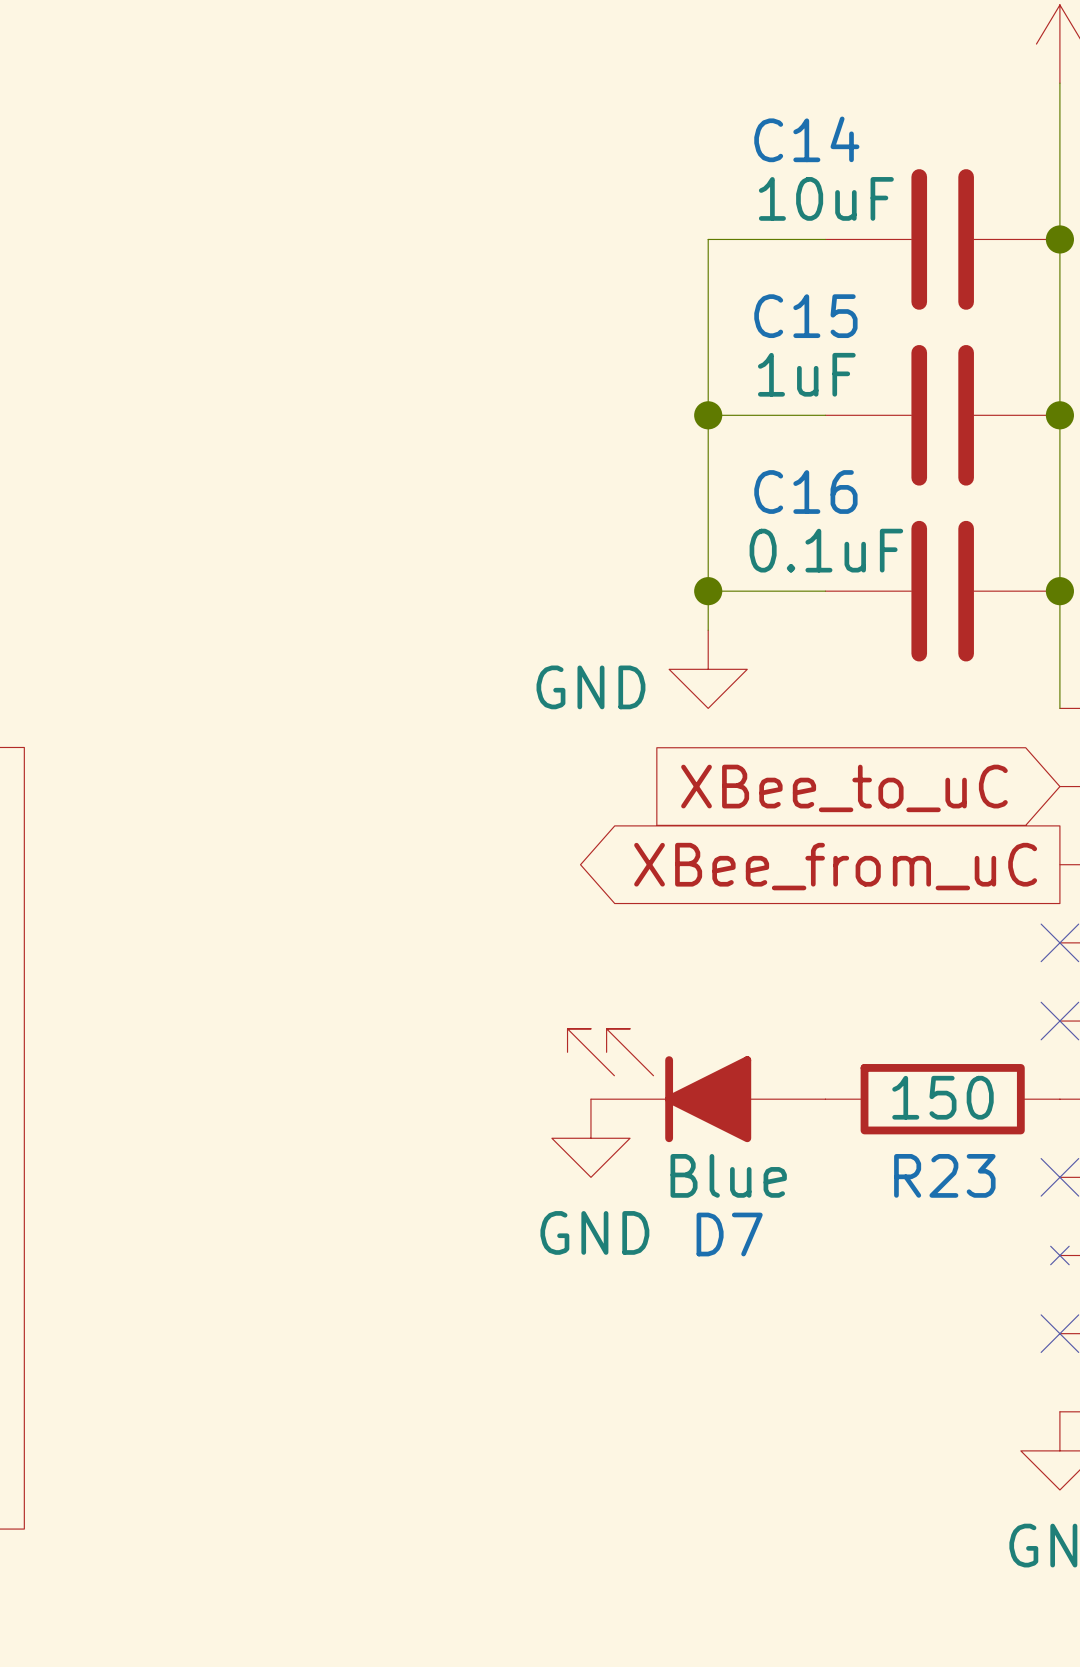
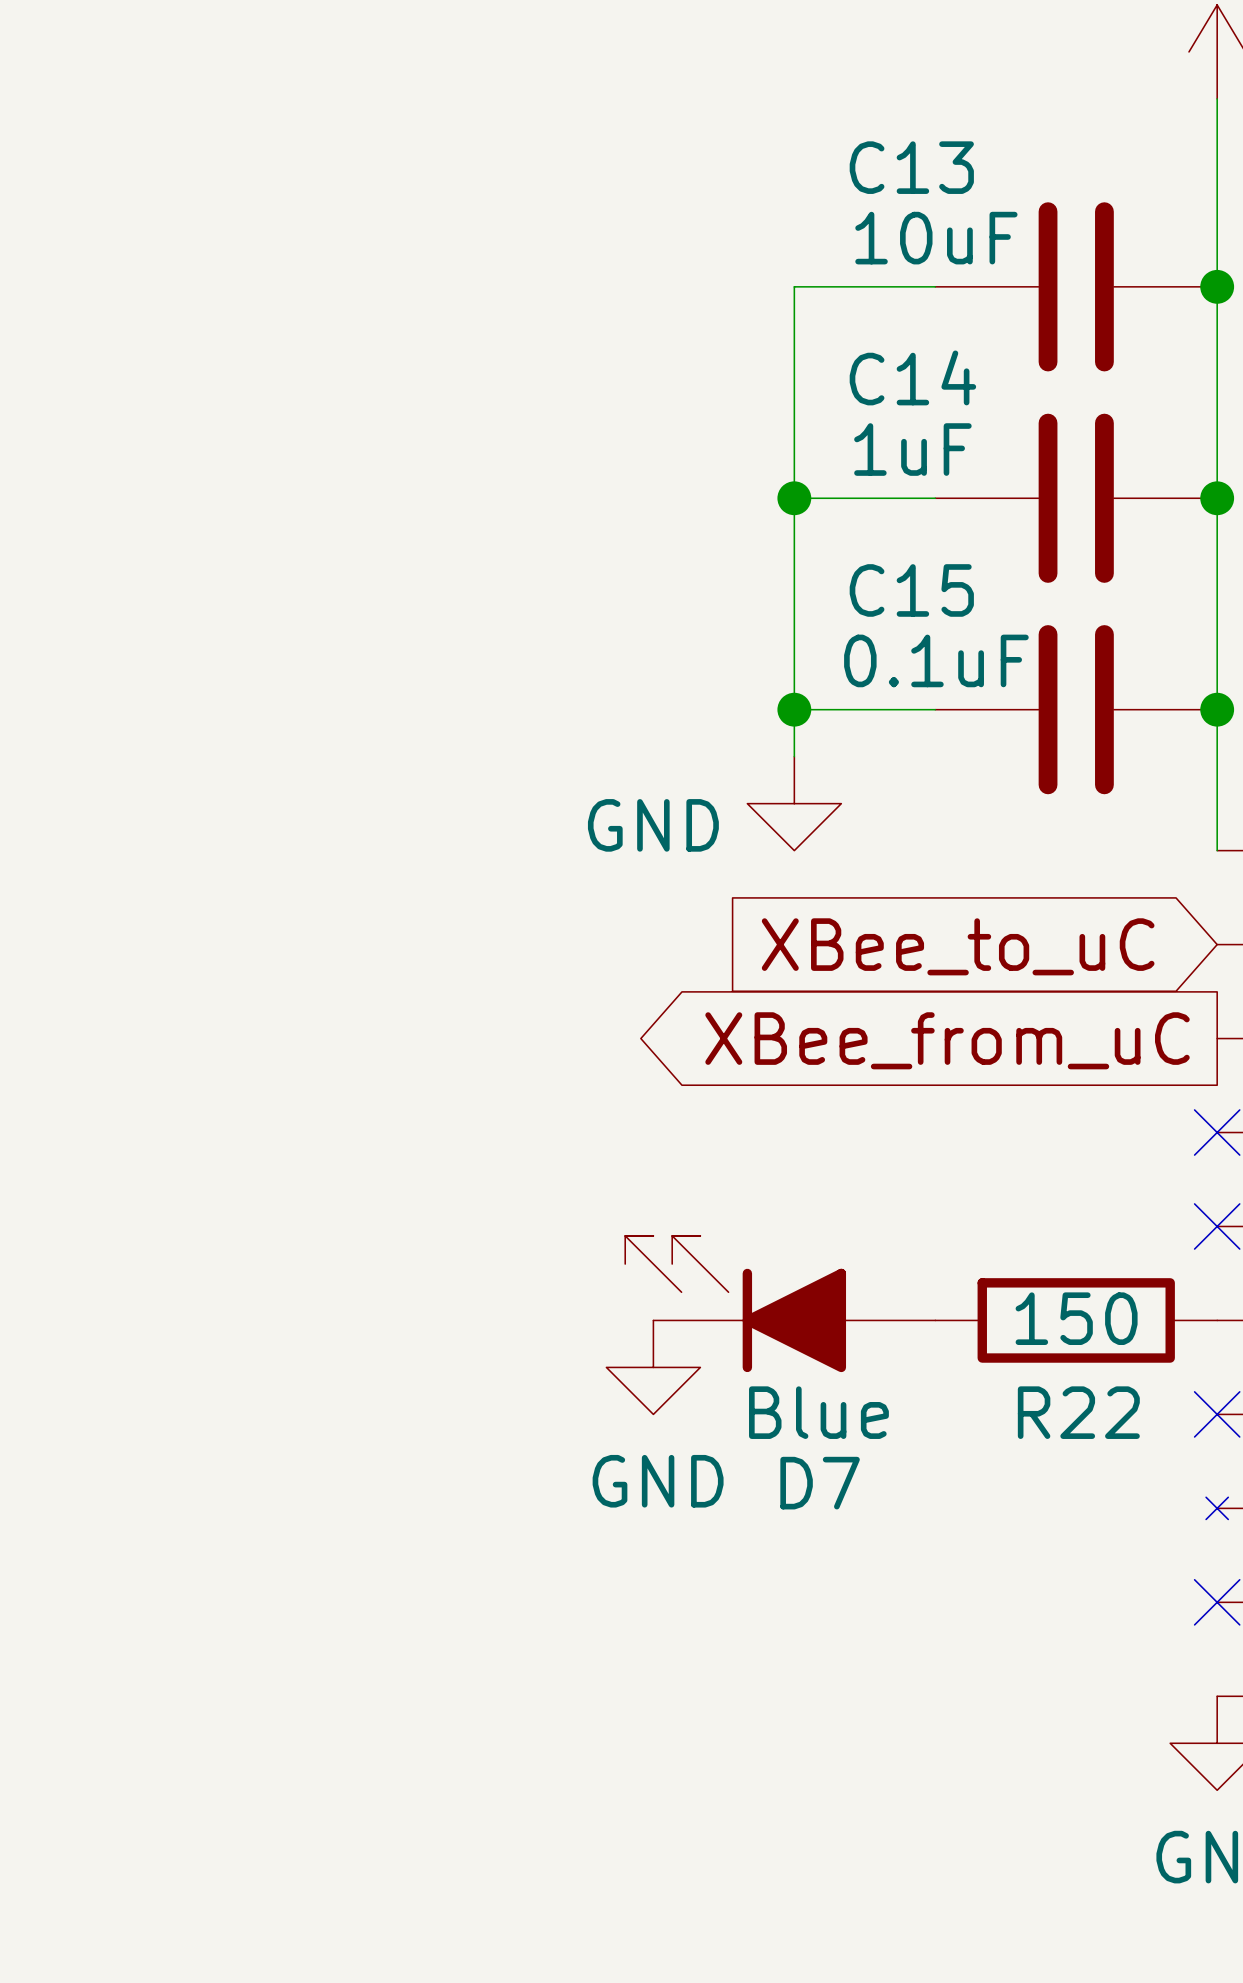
C14 name: C14 (806, 139) -> C13 (911, 167)
C15 name: C15 (805, 316) -> C14 (912, 377)
C16 name: C16 (805, 492) -> C15 (911, 590)
R23 name: R23 (944, 1175) -> R22 (1078, 1412)

